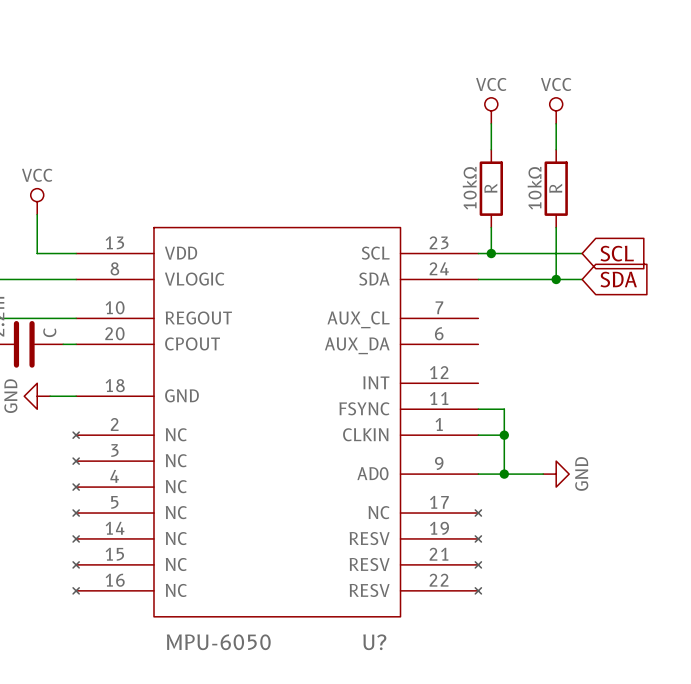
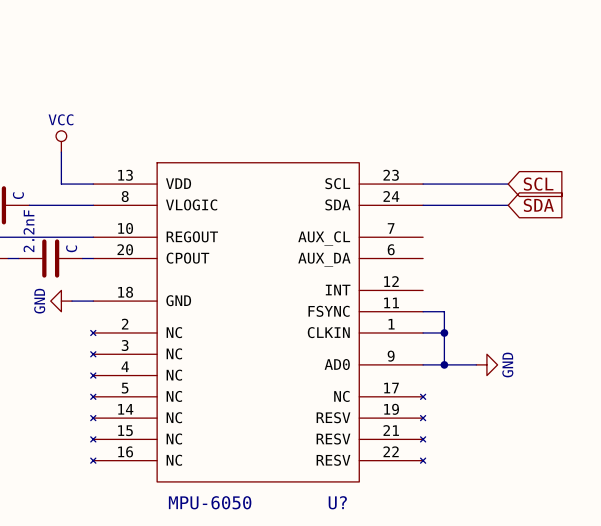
power symbol: VCC (491, 110) -> none
power symbol: VCC (556, 110) -> none
wire: (491, 123) (491, 149) -> none
wire: (556, 123) (556, 149) -> none
10kΩ: R (491, 188) -> none
10kΩ: R (556, 188) -> none
wire: (491, 227) (491, 253) -> none
wire: (556, 227) (556, 279) -> none
junction: (491, 253) -> none
junction: (556, 279) -> none

